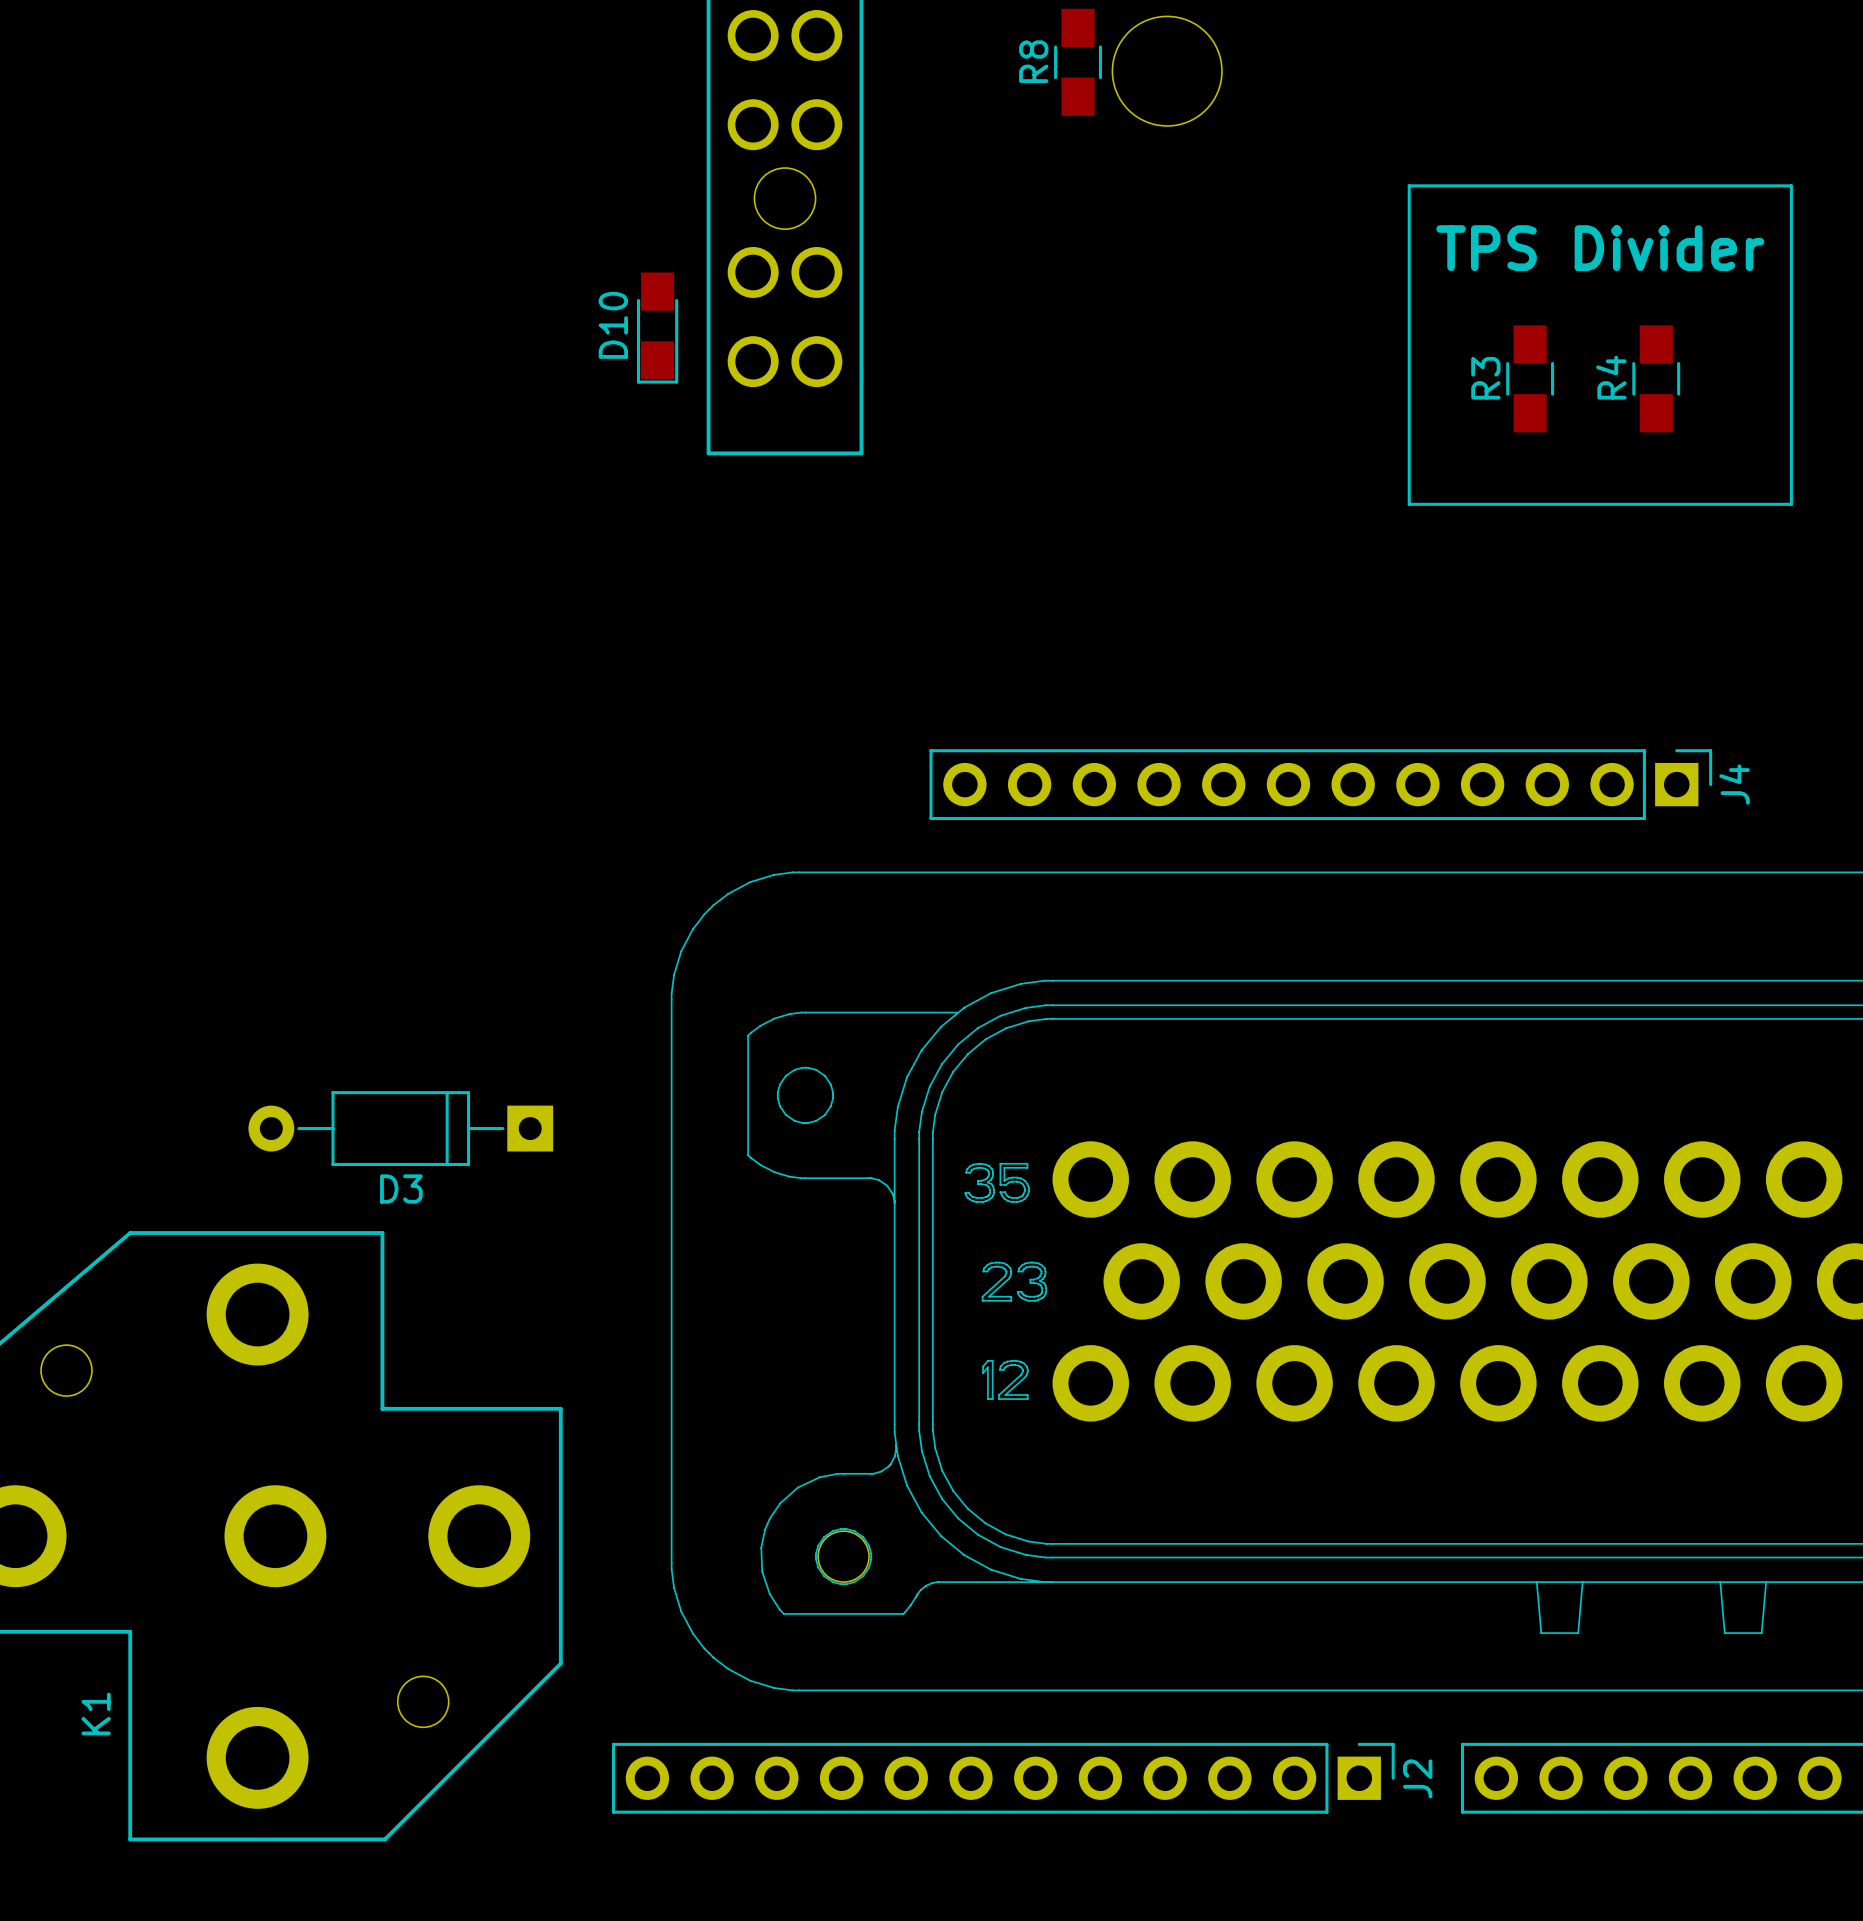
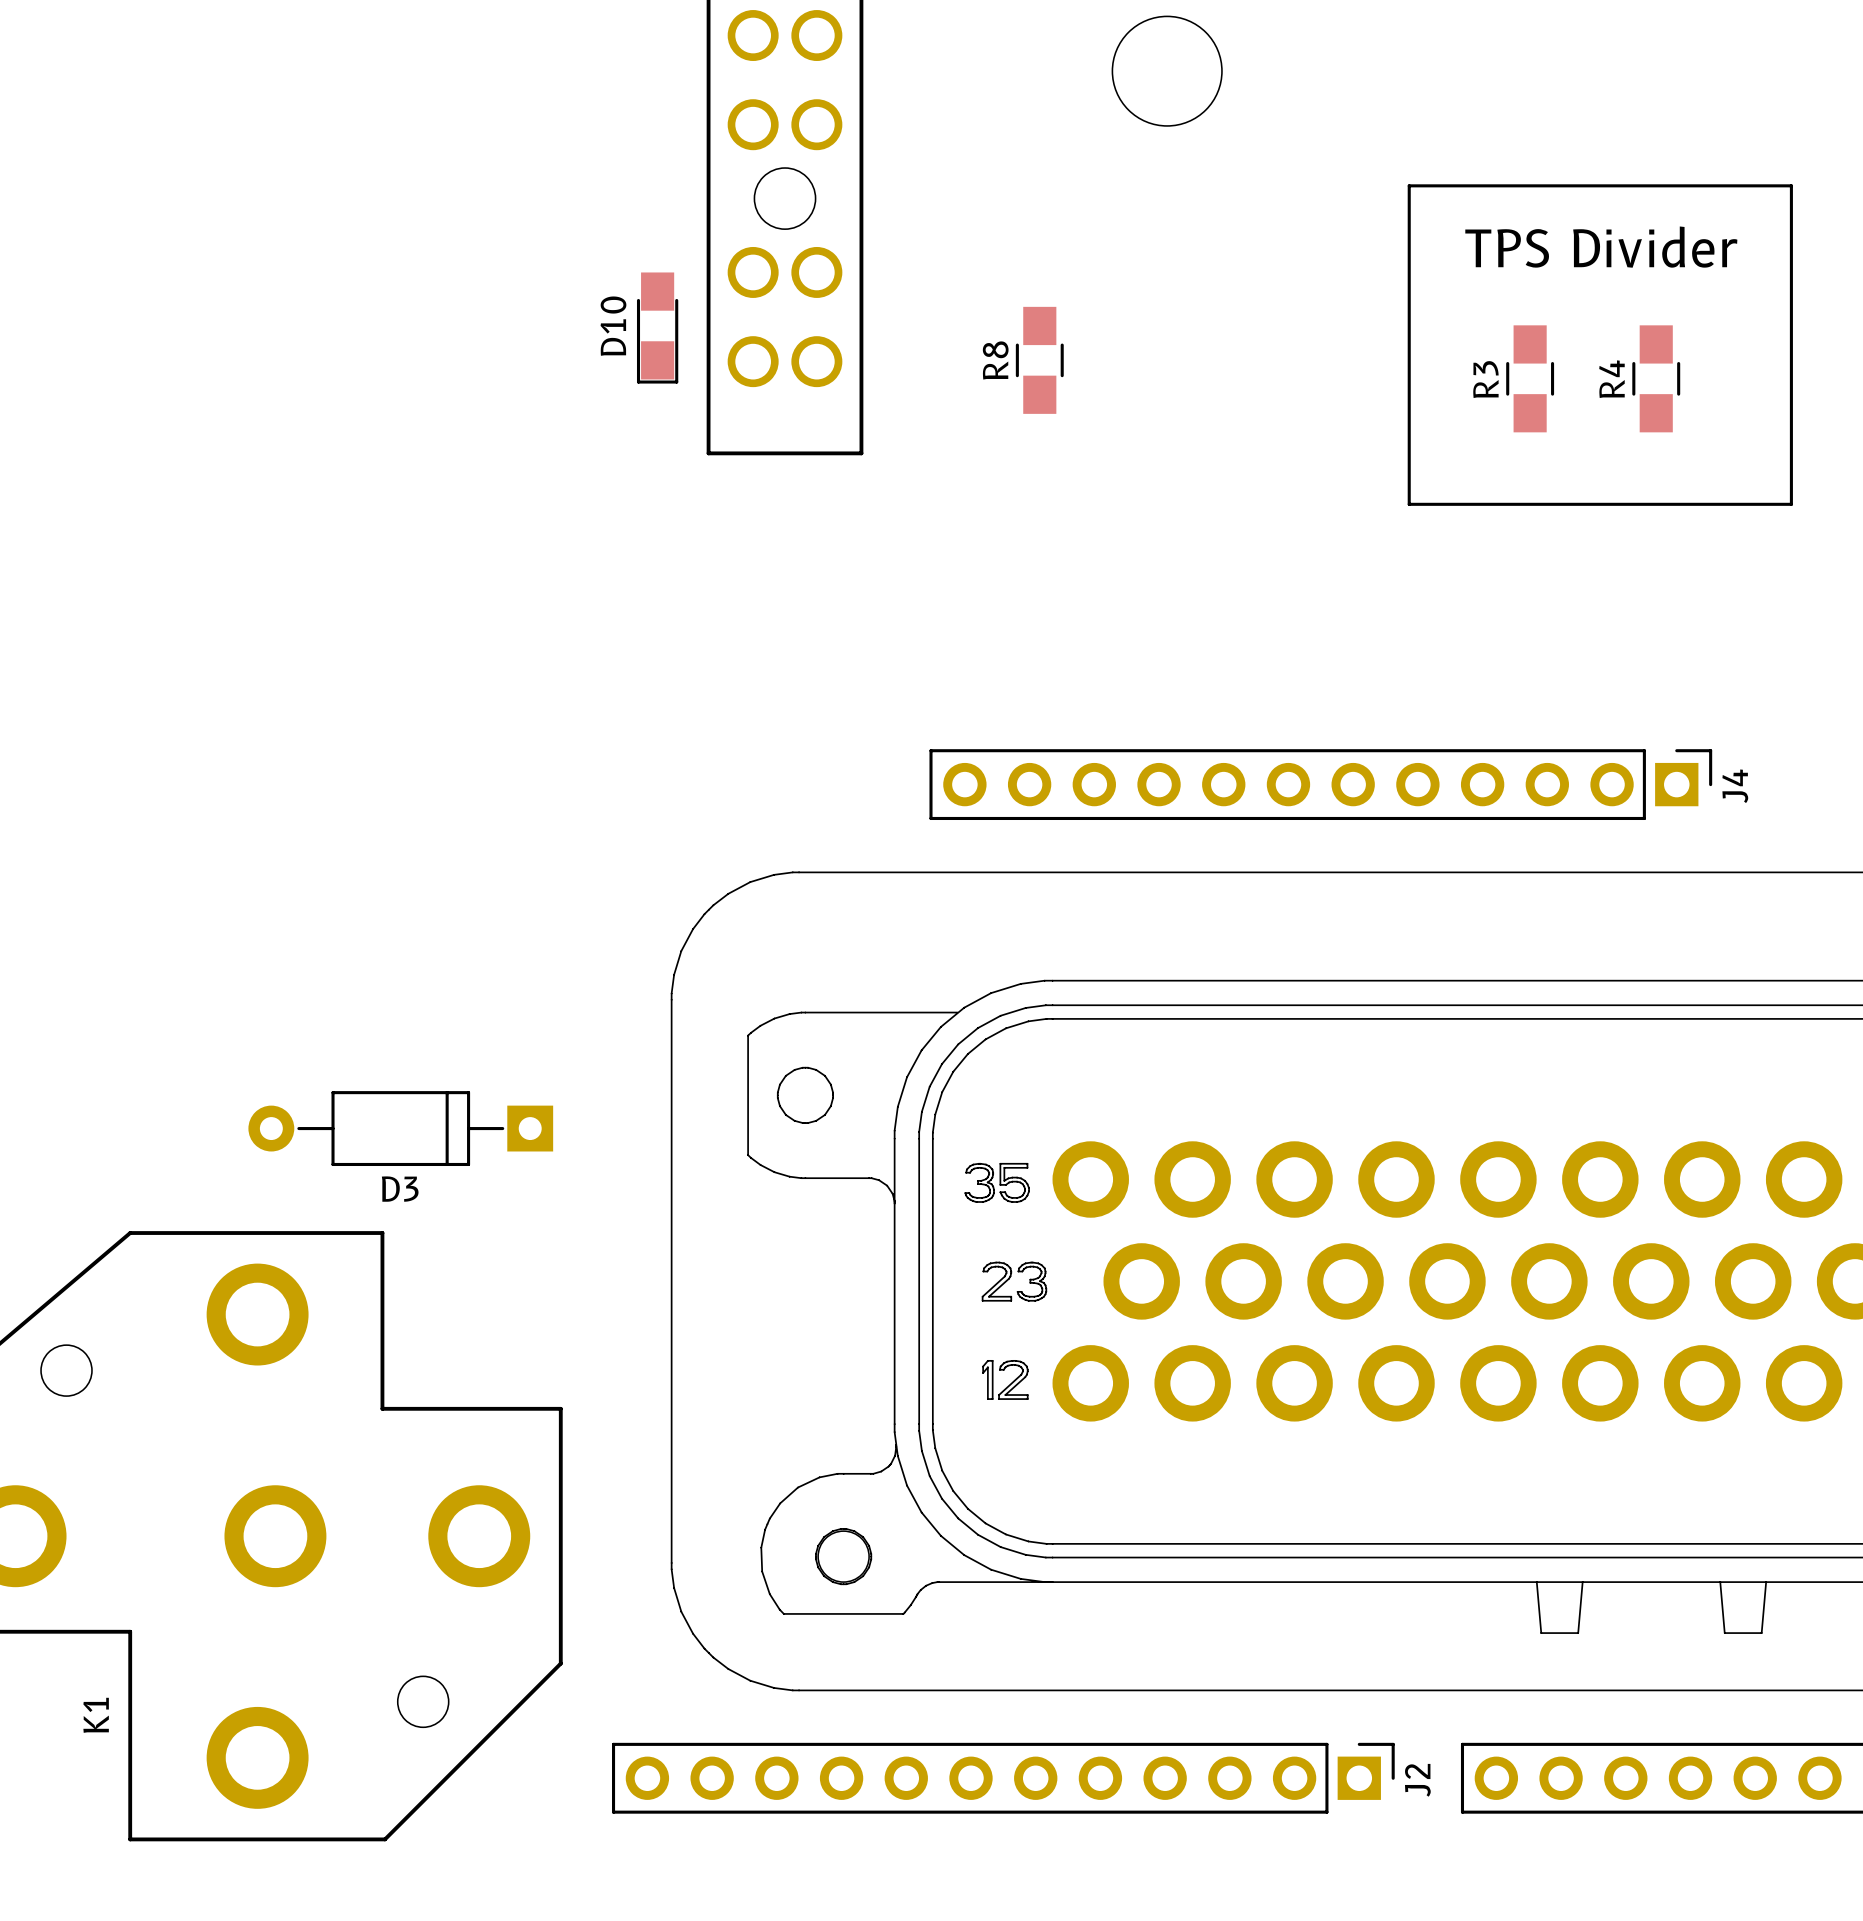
R8 position: (1078, 62) -> (1039, 360)

